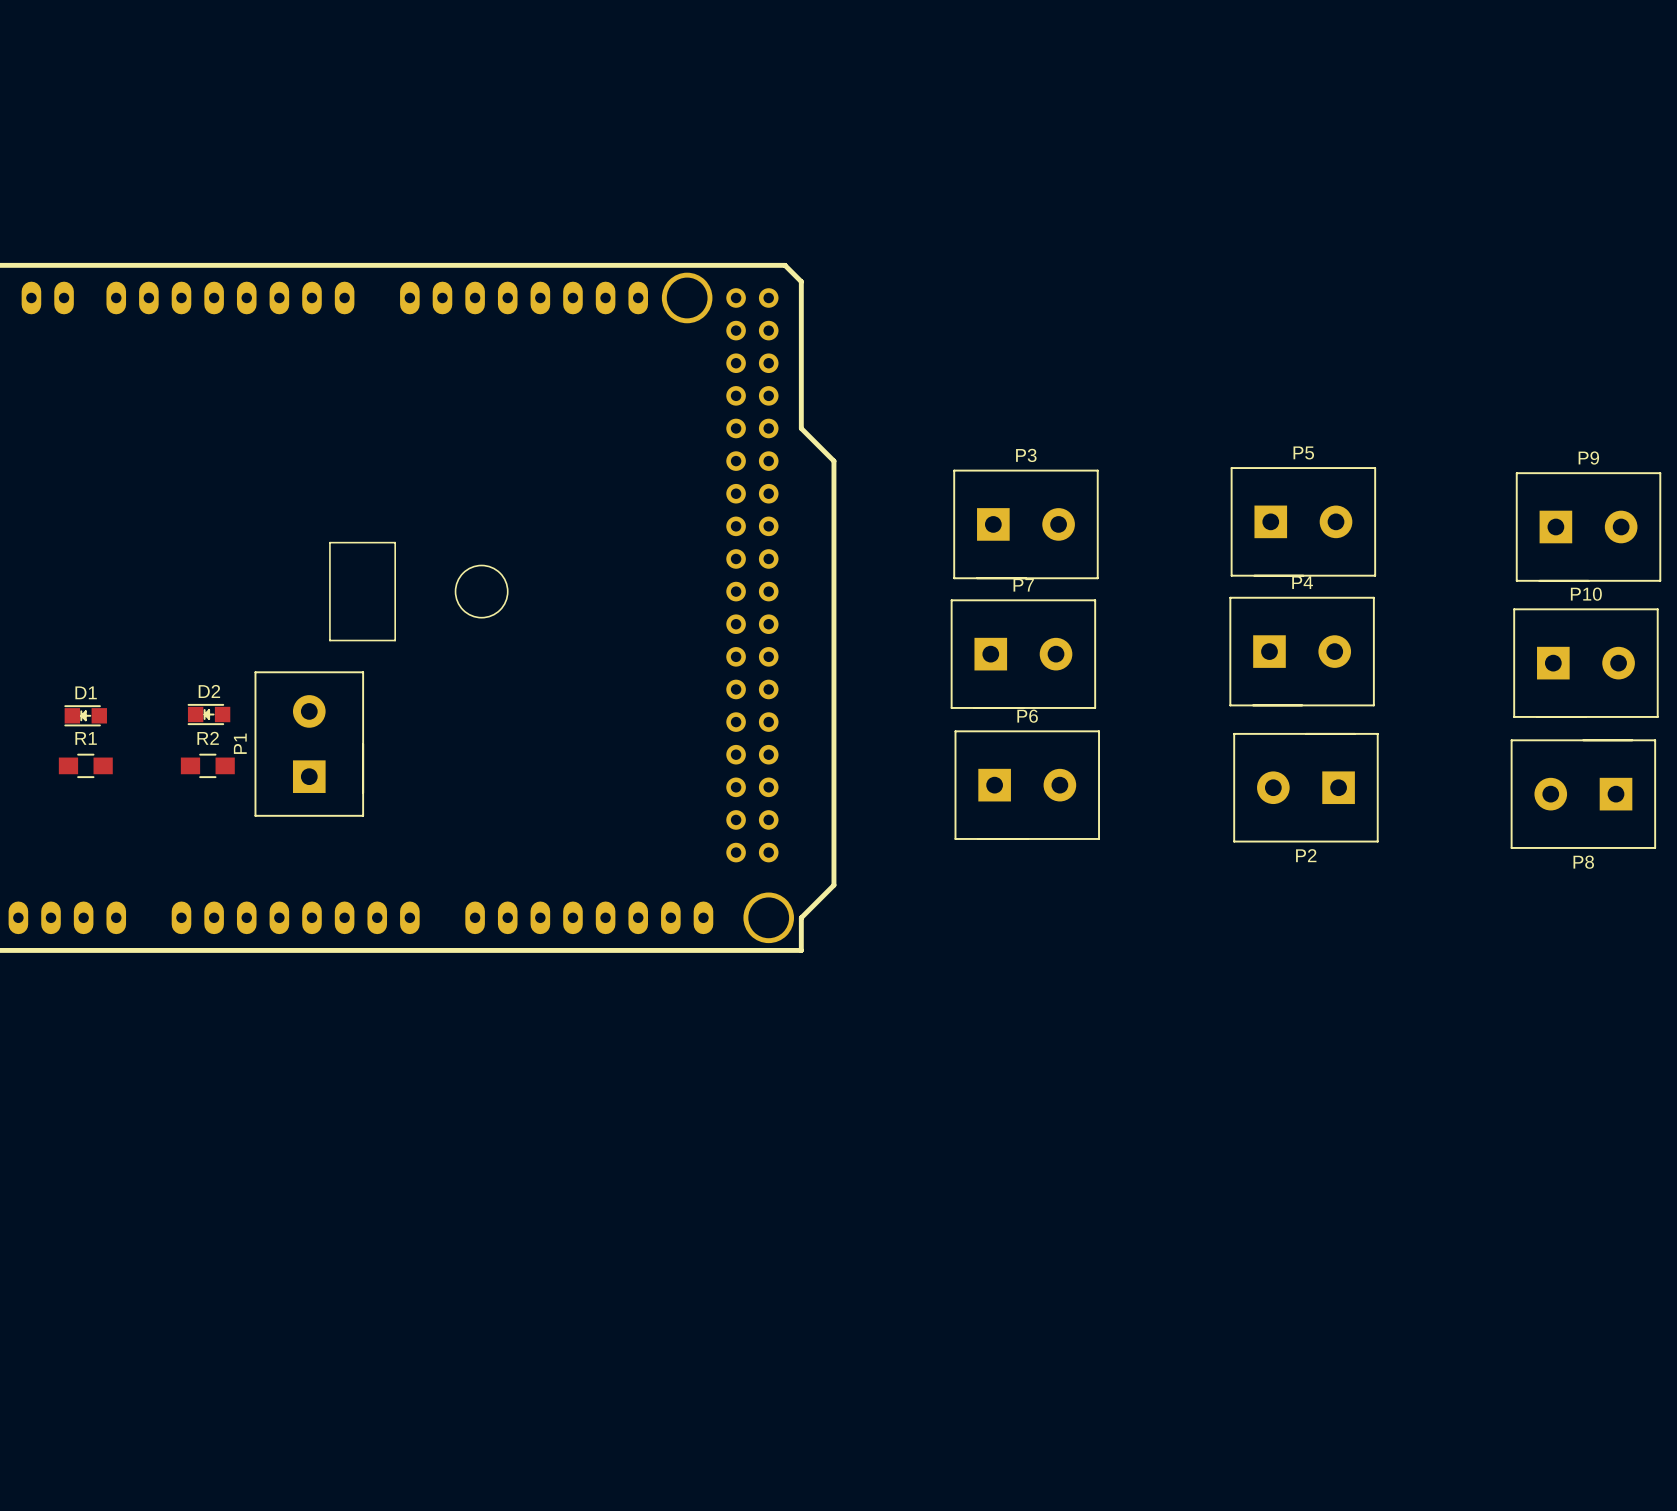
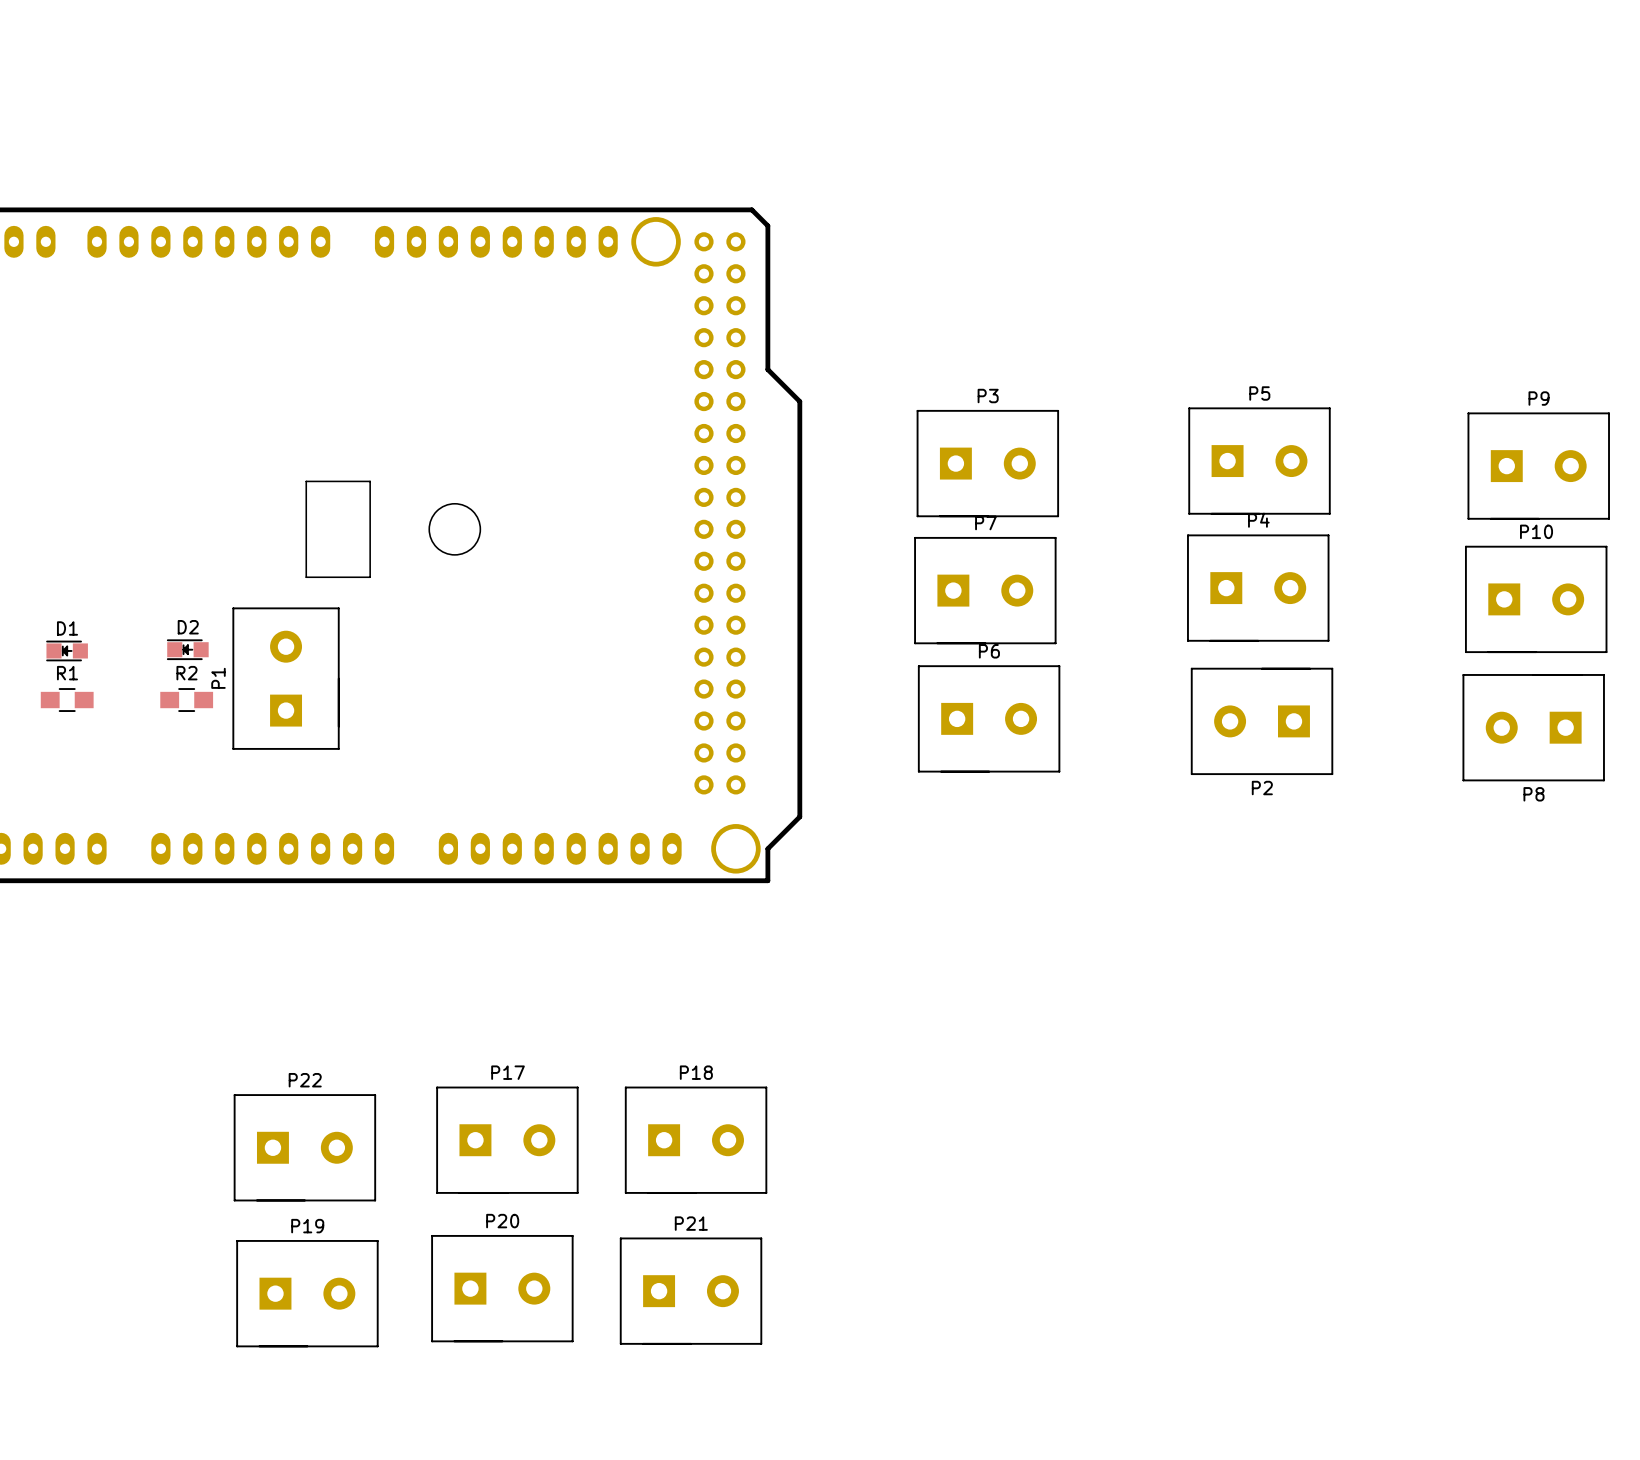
P17: none -> (507, 1140)
P18: none -> (696, 1140)
P22: none -> (304, 1147)
P20: none -> (502, 1288)
P21: none -> (691, 1291)
P19: none -> (307, 1293)

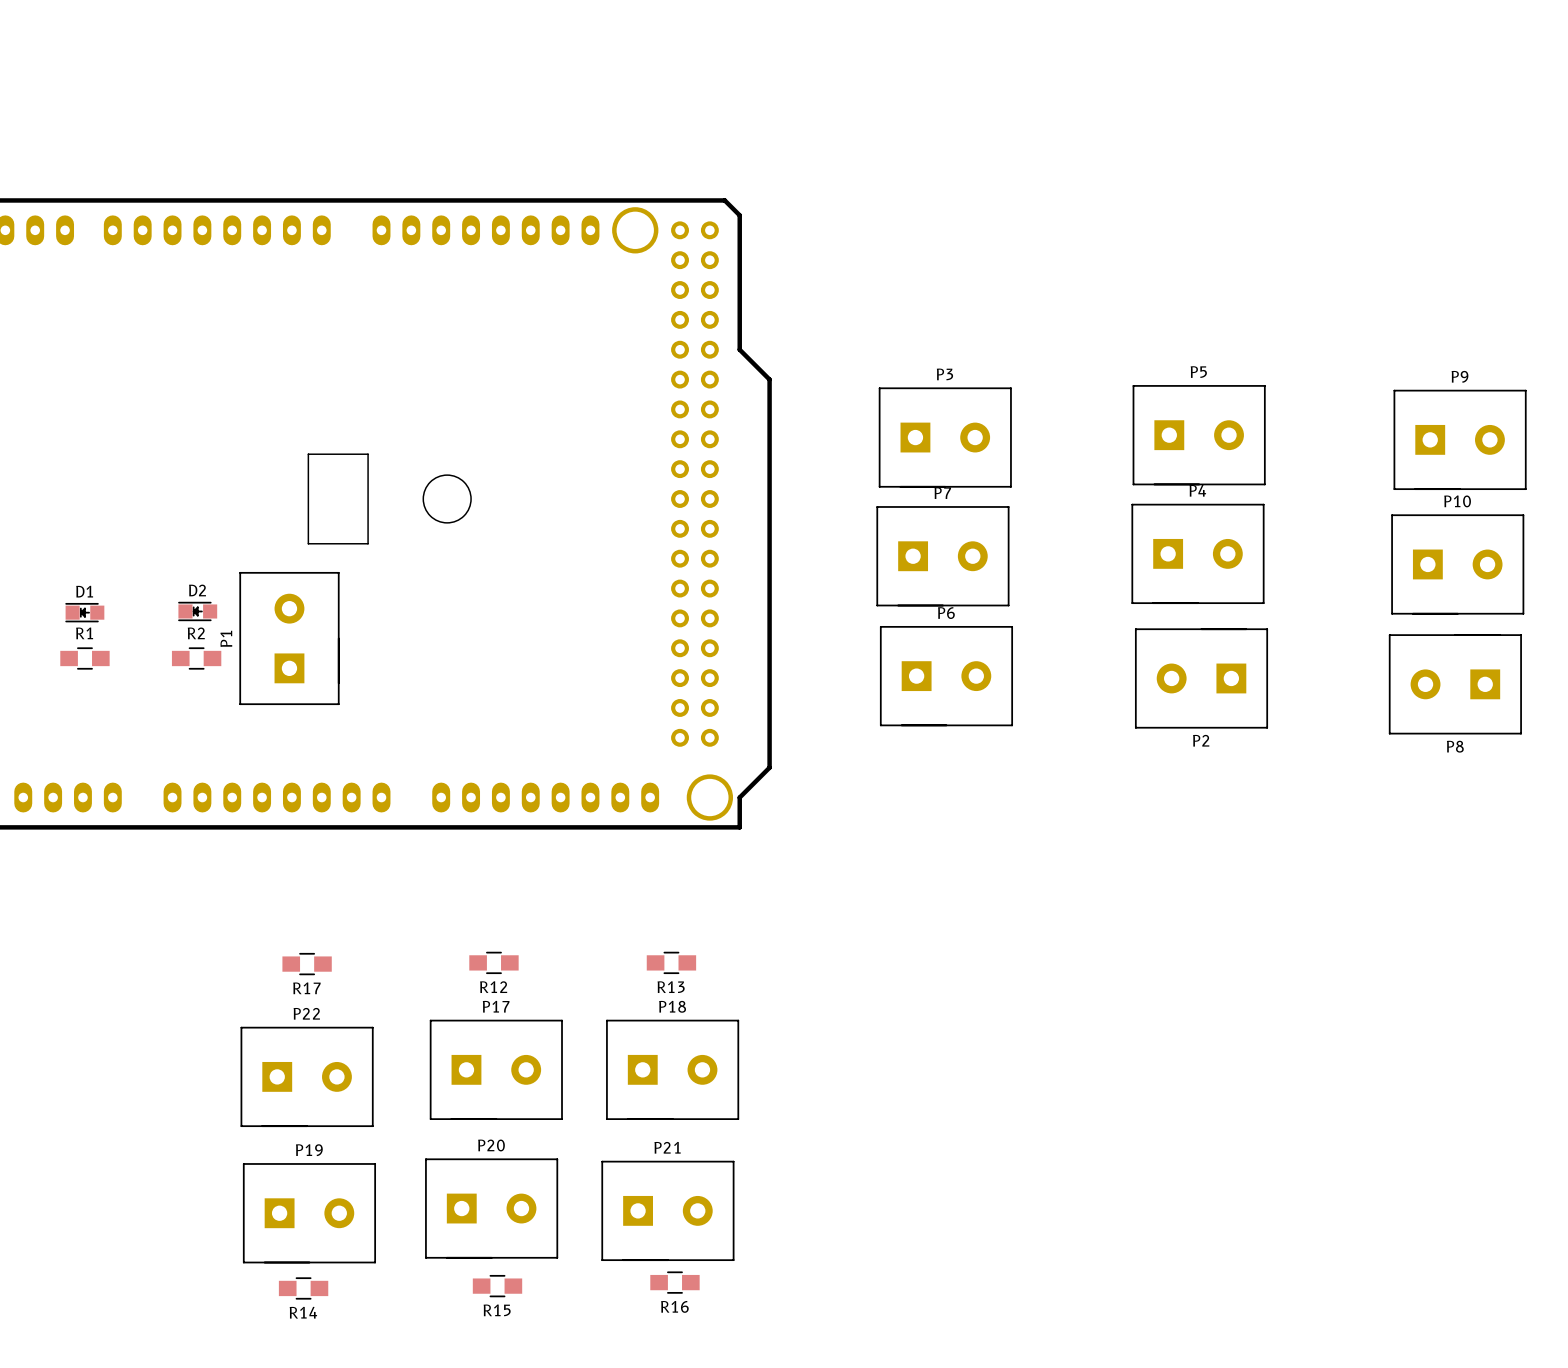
R12: none -> (493, 962)
R13: none -> (671, 962)
R17: none -> (307, 964)
R16: none -> (674, 1282)
R15: none -> (497, 1286)
R14: none -> (303, 1288)

